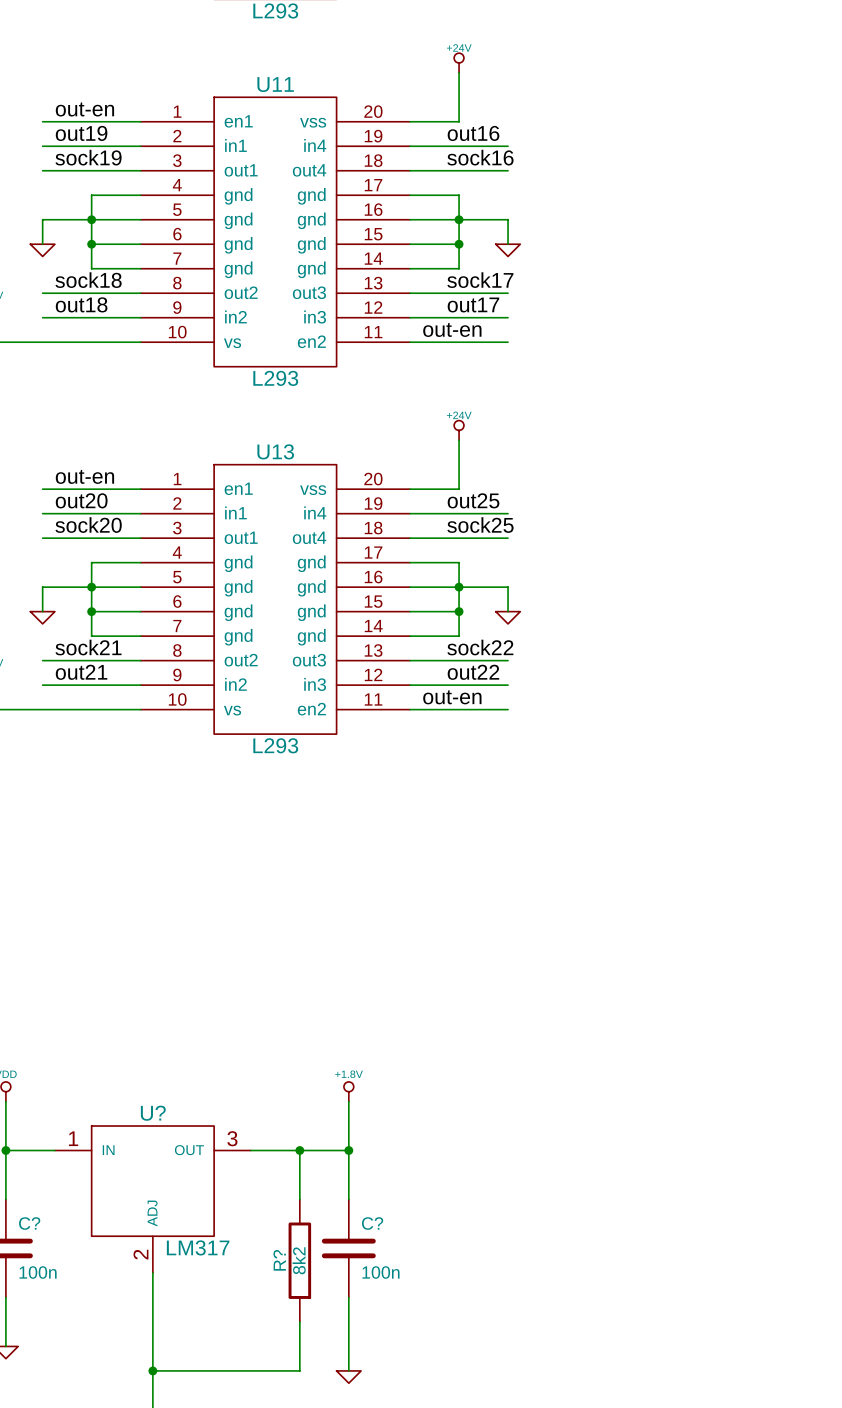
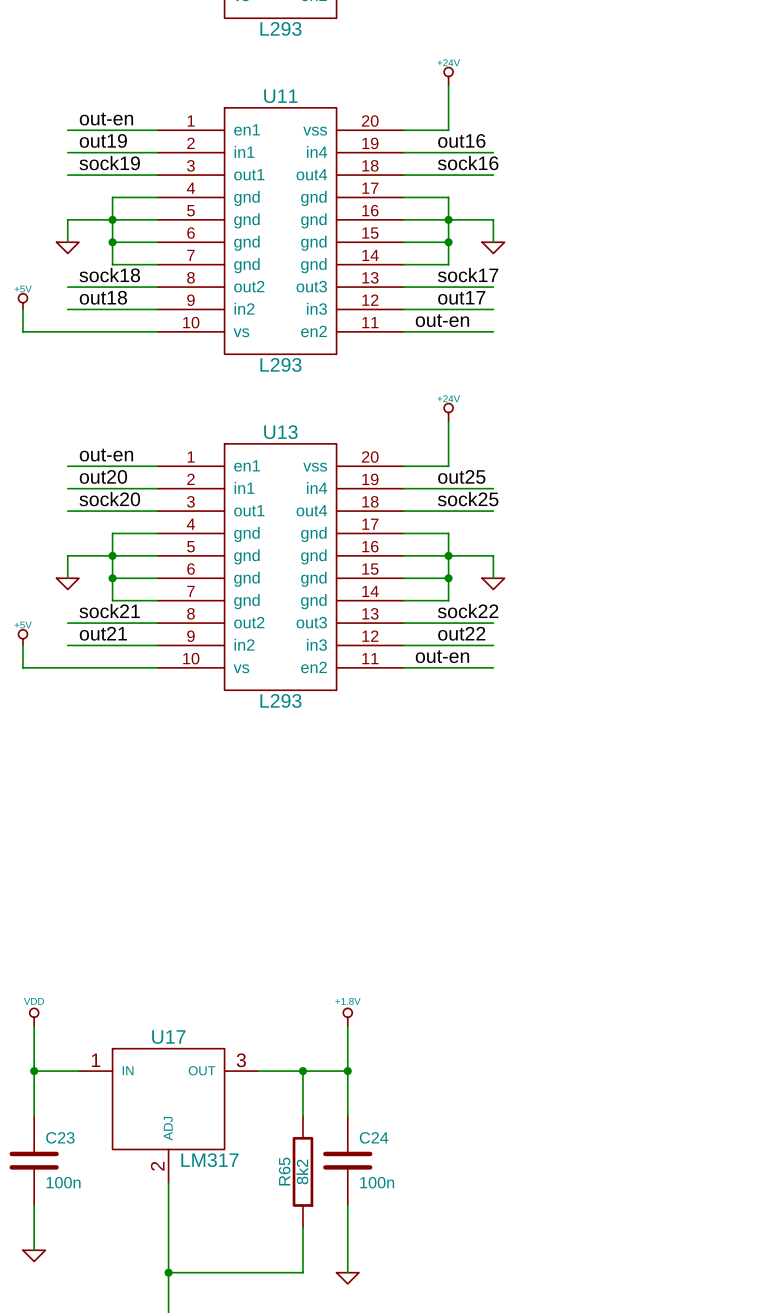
U? name: U? (153, 1113) -> U17 (168, 1037)
C? name: C? (29, 1223) -> C23 (60, 1137)
C? name: C? (372, 1223) -> C24 (374, 1137)
R? name: R? (279, 1260) -> R65 (284, 1171)

